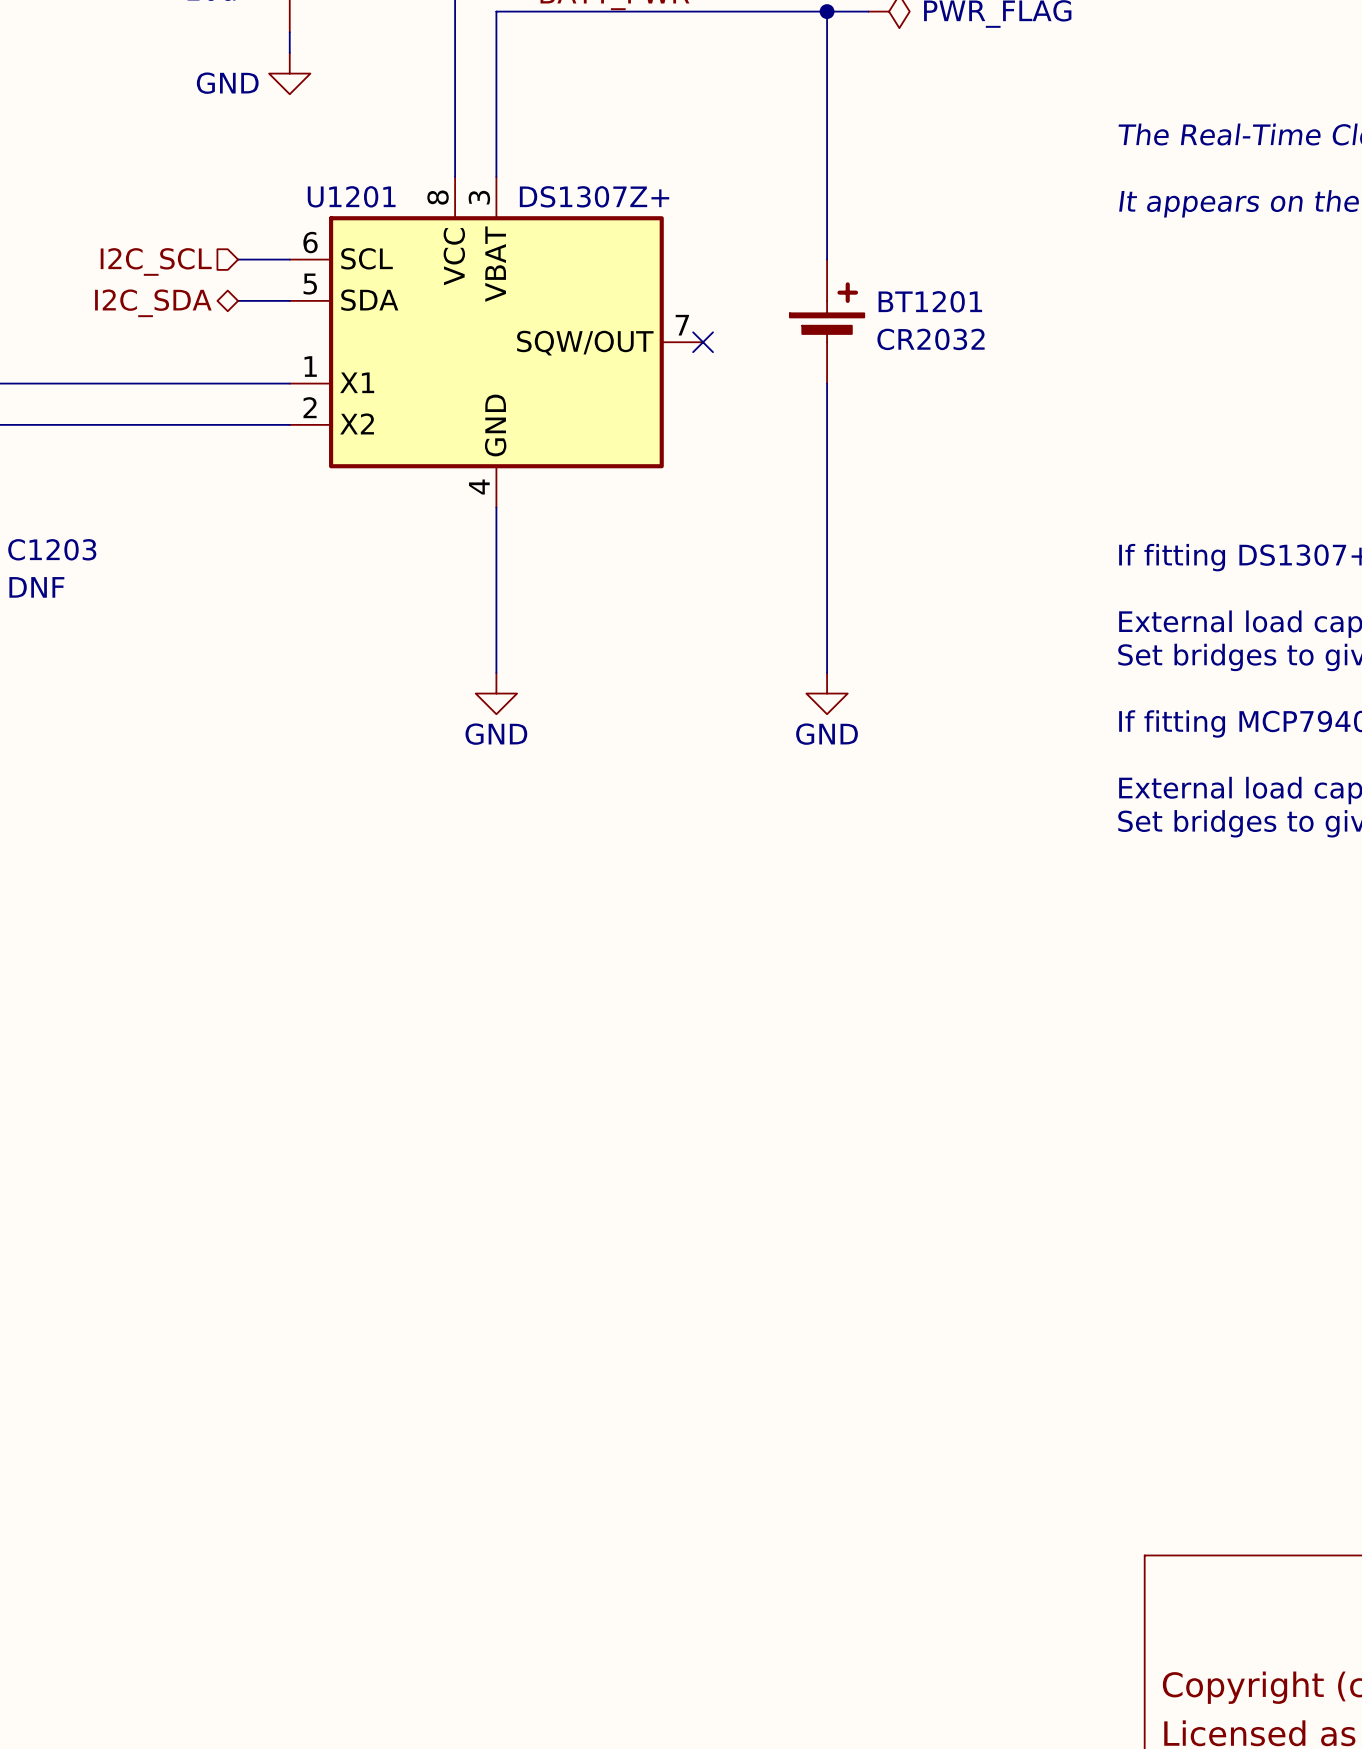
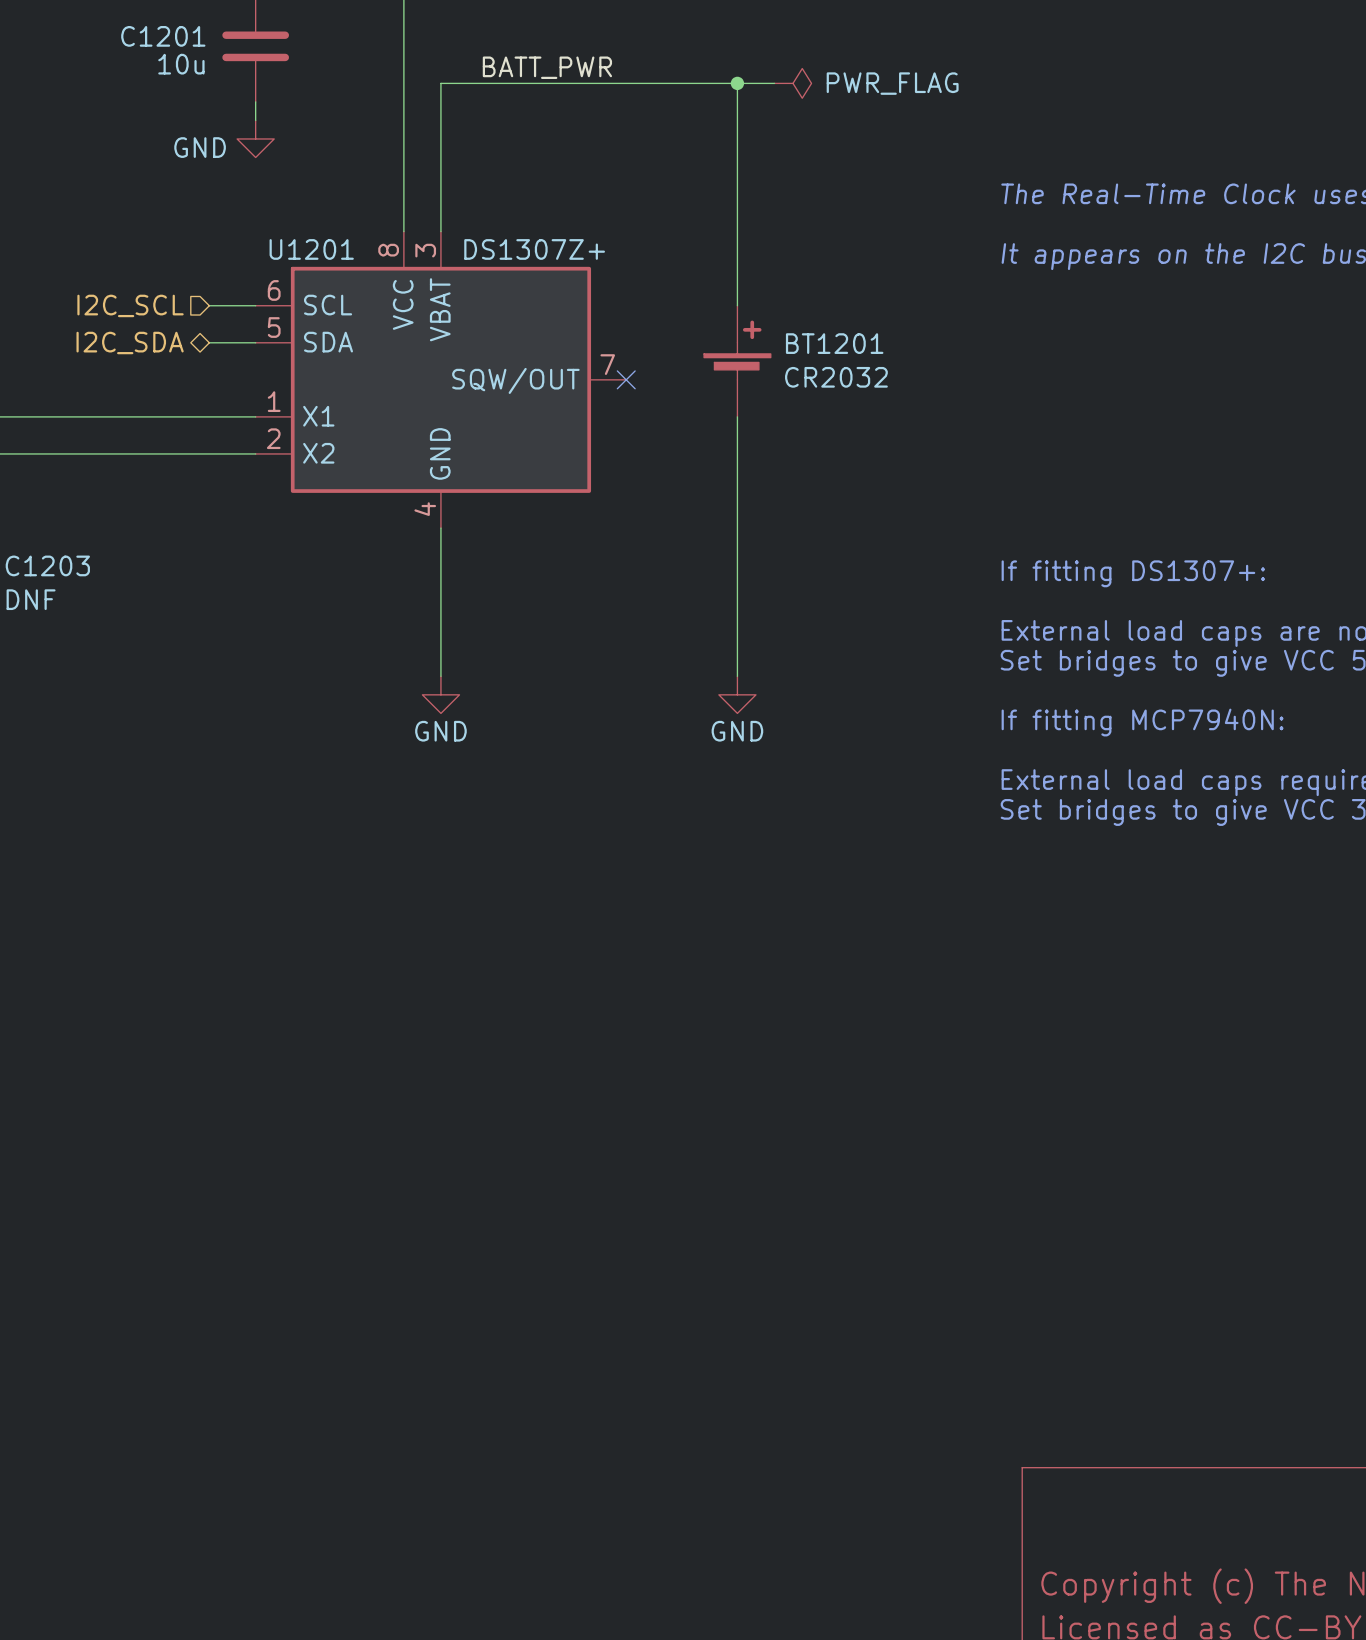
BT1201 symbol: [789, 259, 865, 384] -> [704, 305, 771, 417]

